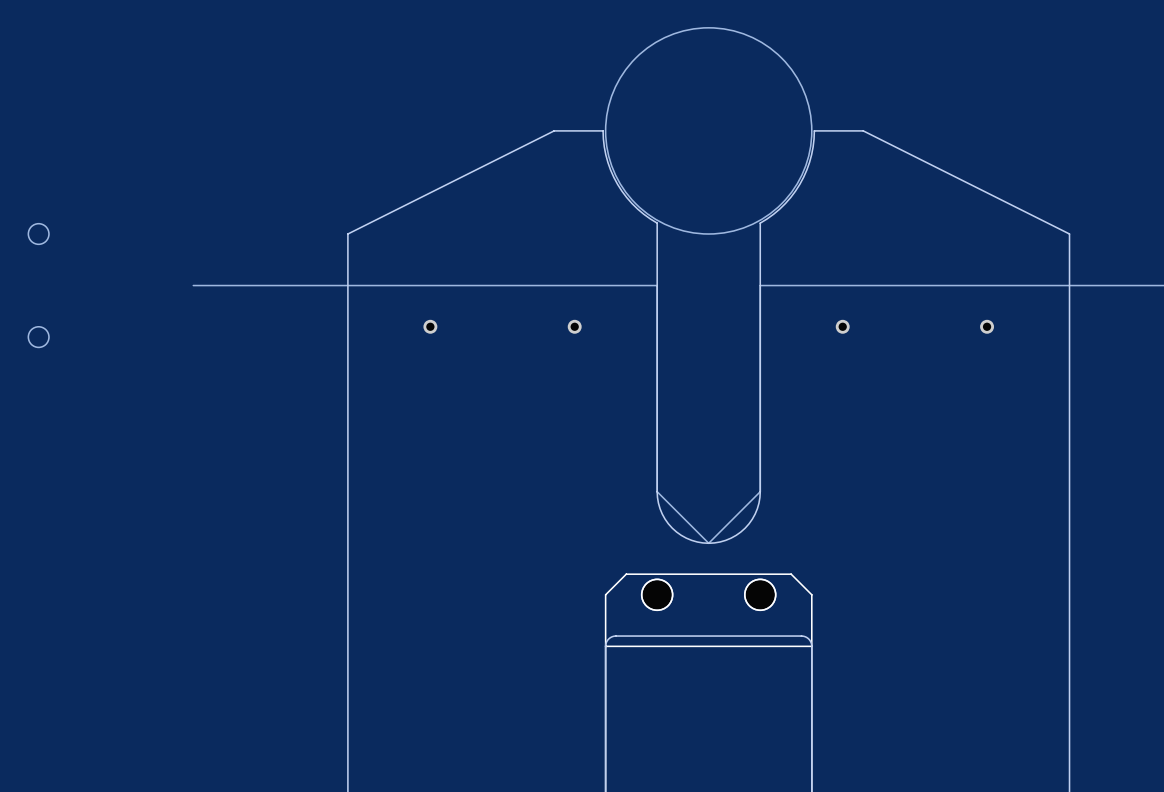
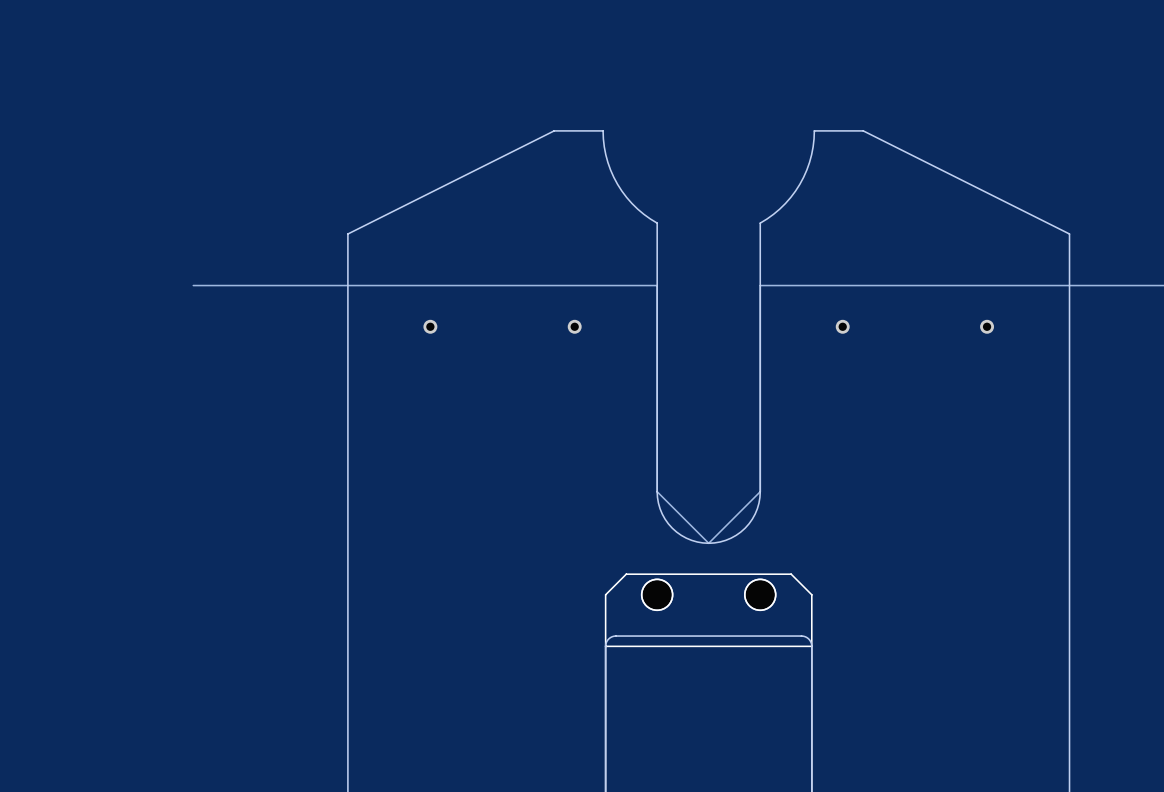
drawing: [605, 27, 813, 235] -> none
drawing: [27, 222, 50, 246] -> none
drawing: [27, 326, 50, 349] -> none

